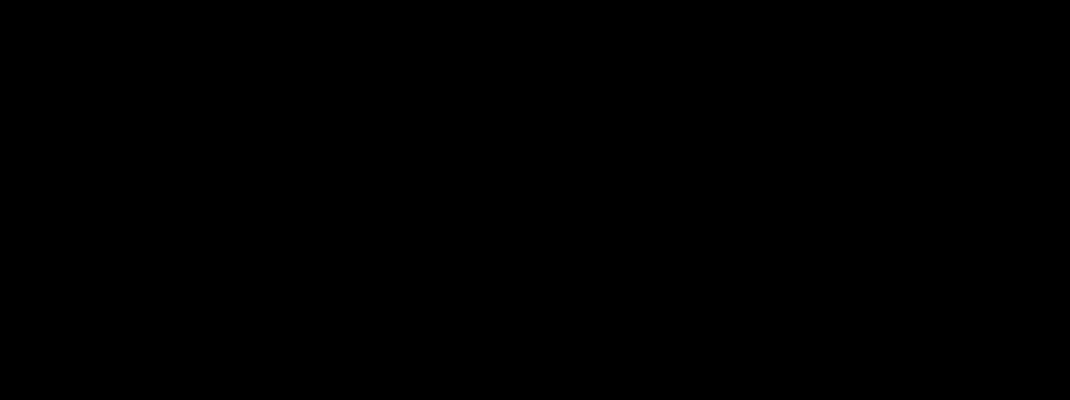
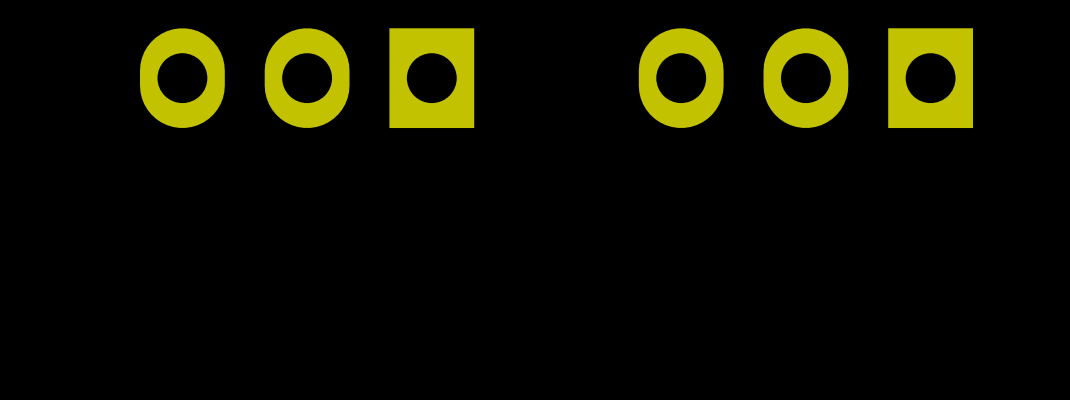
part: none -> (307, 78)
part: none -> (805, 78)

